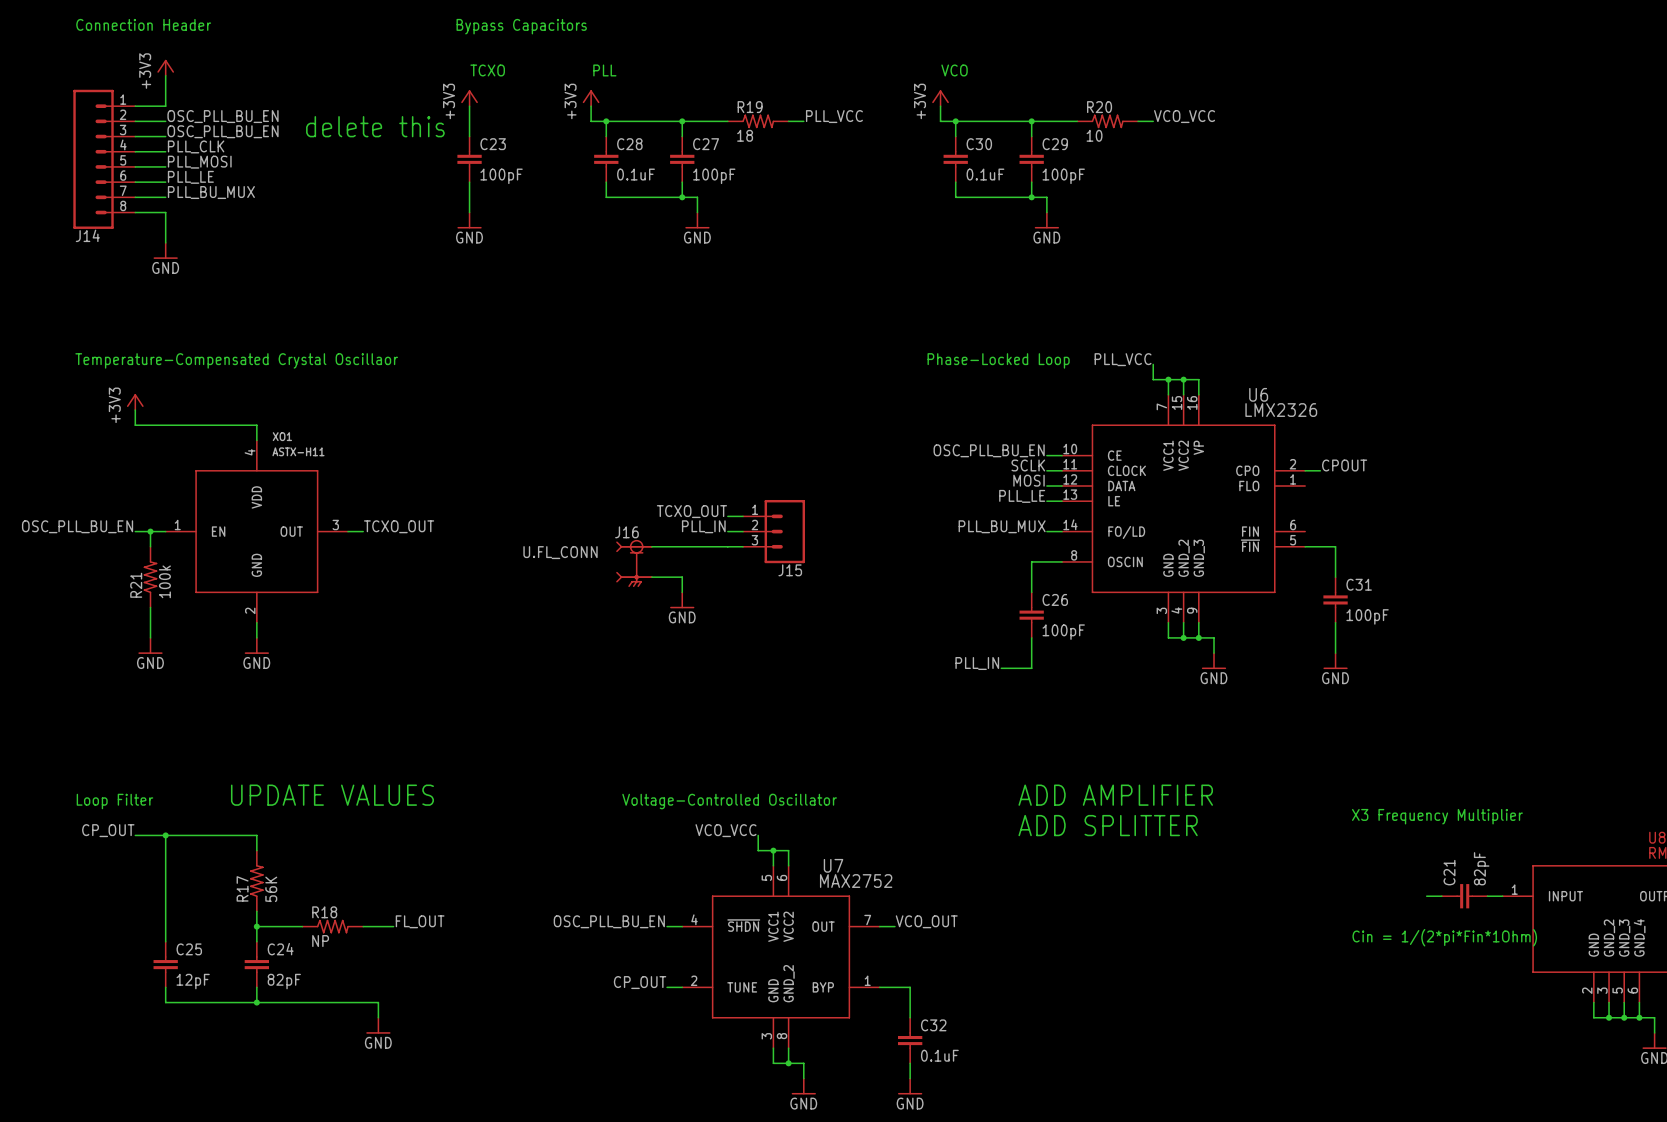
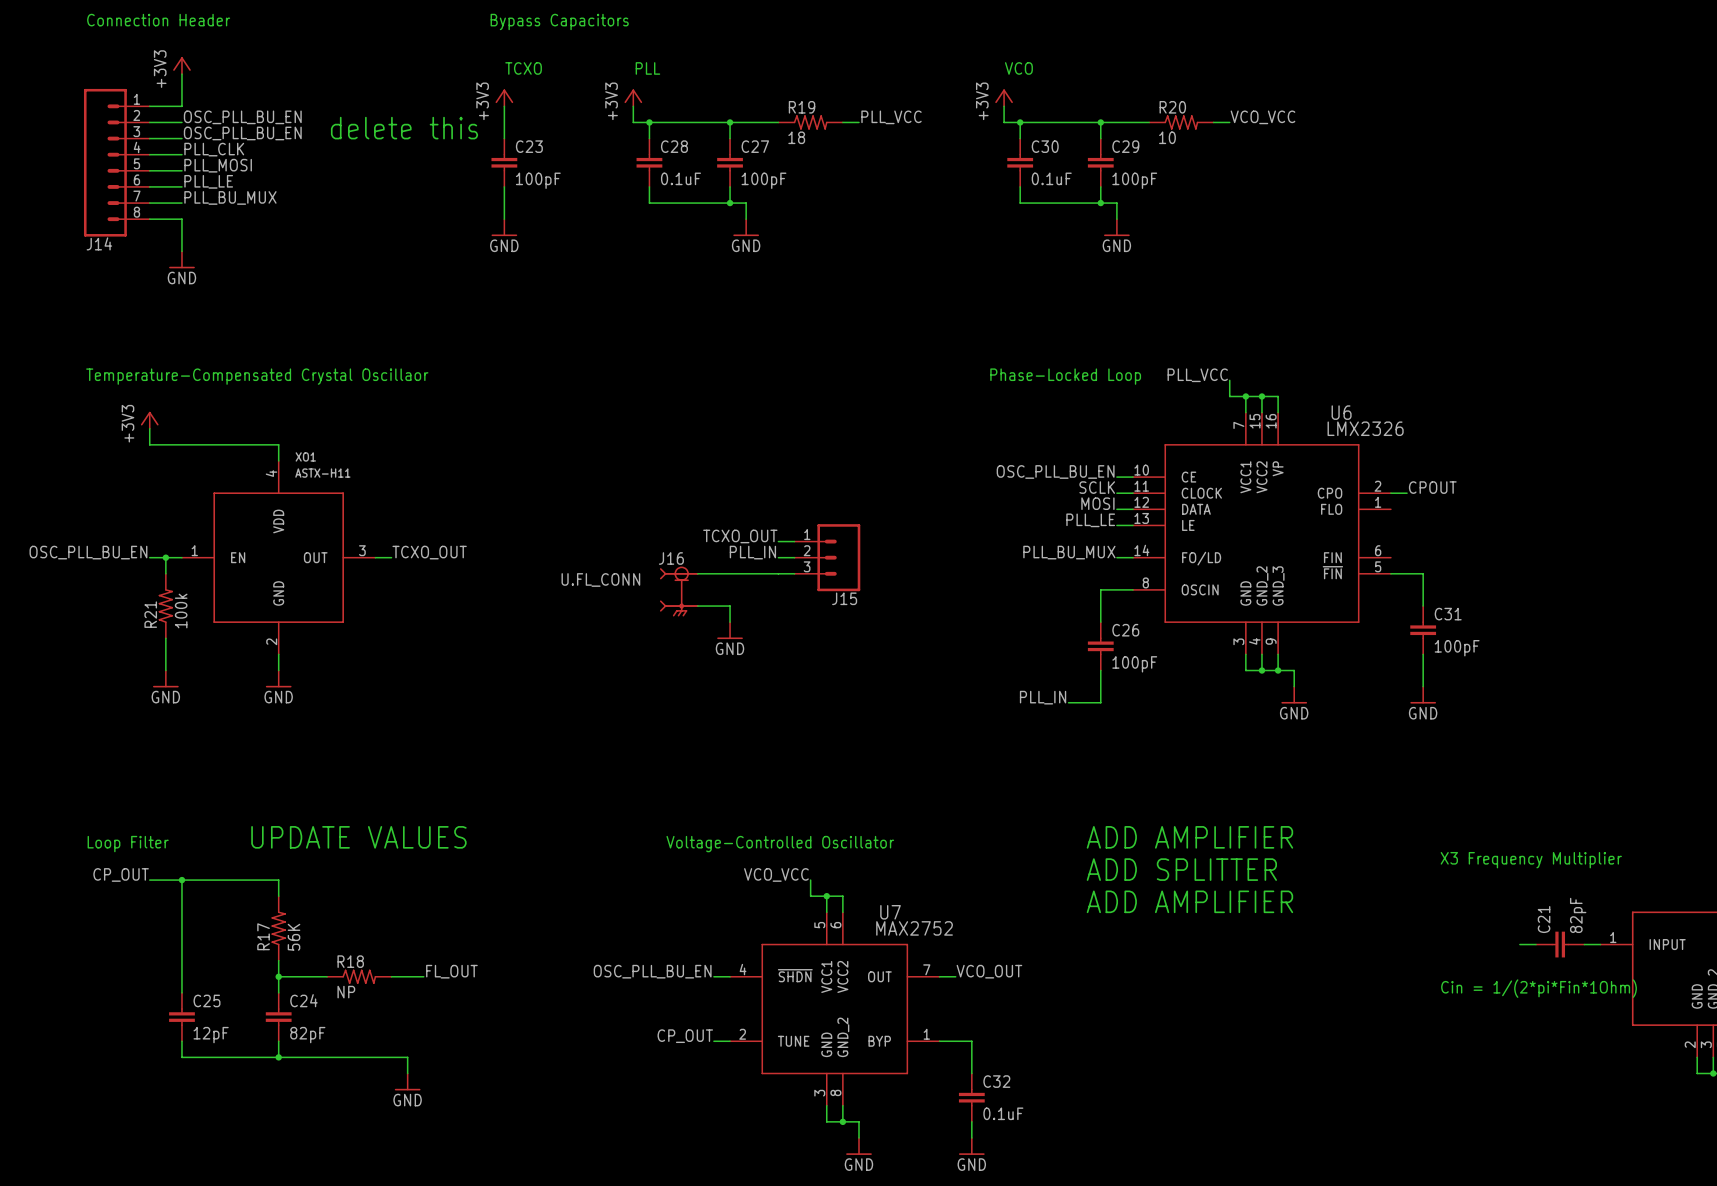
text: none -> ADD AMPLIFIER (1189, 901)

